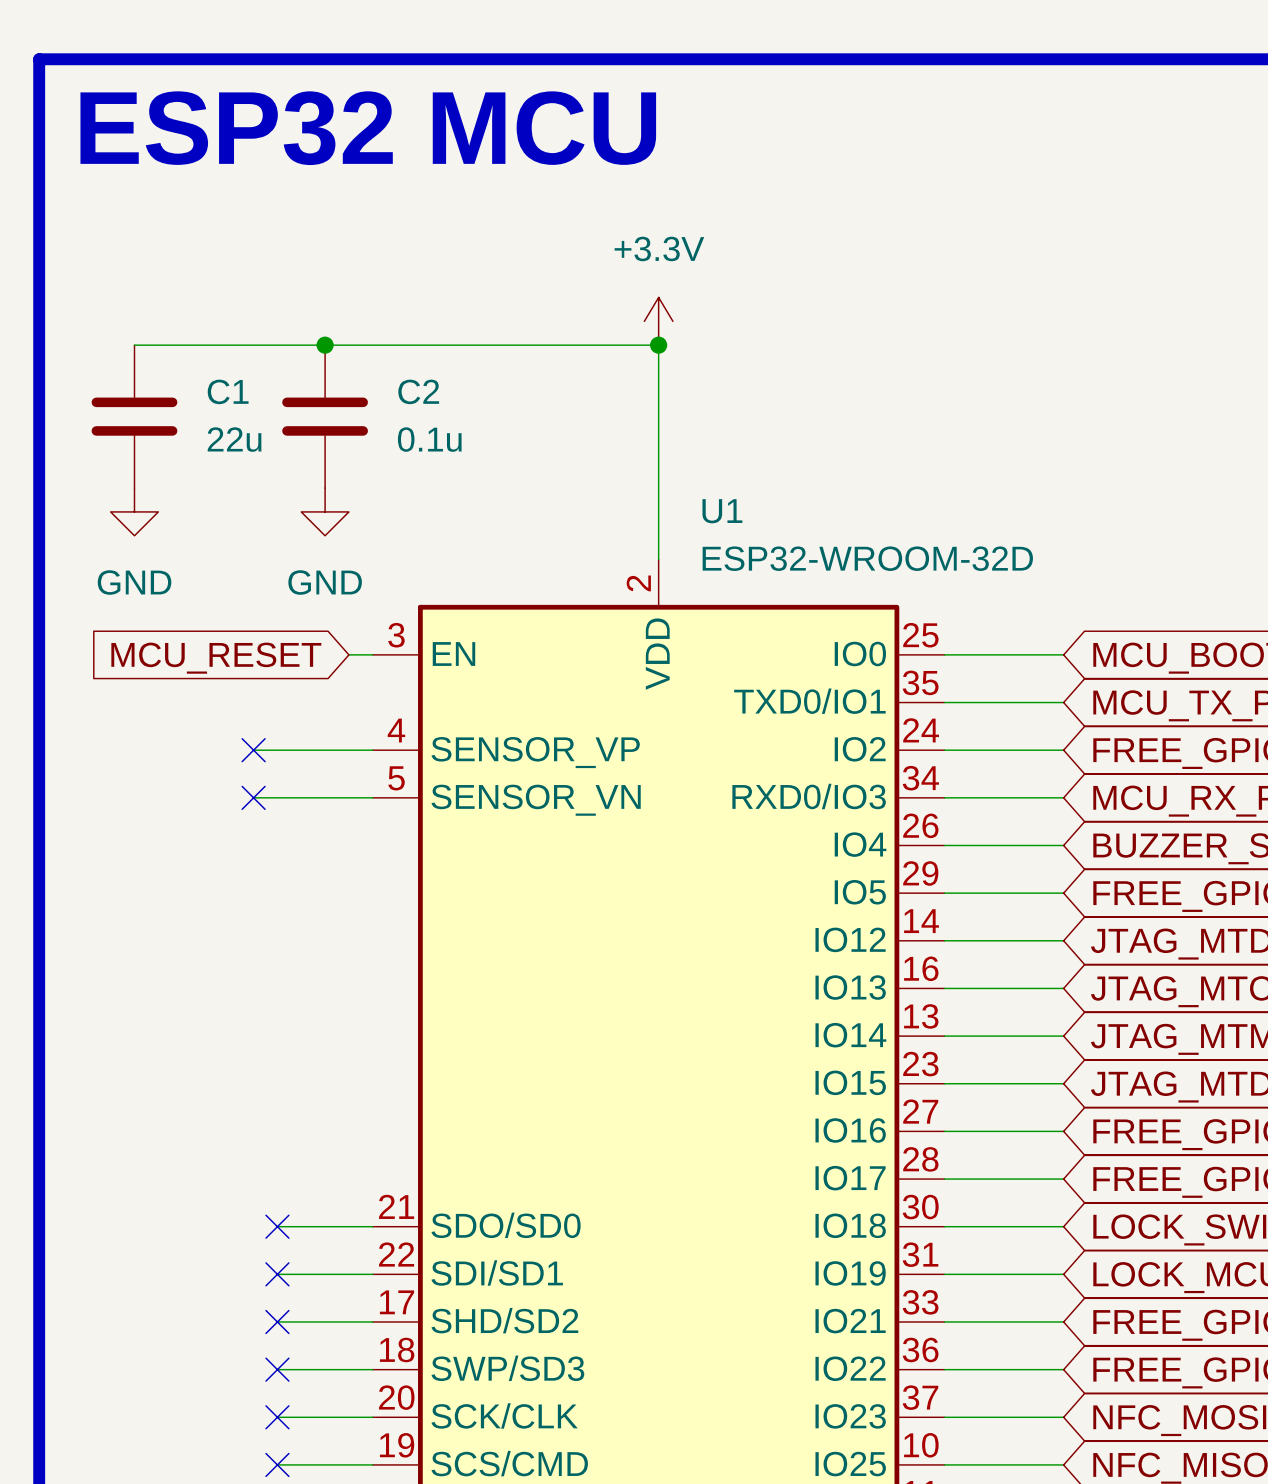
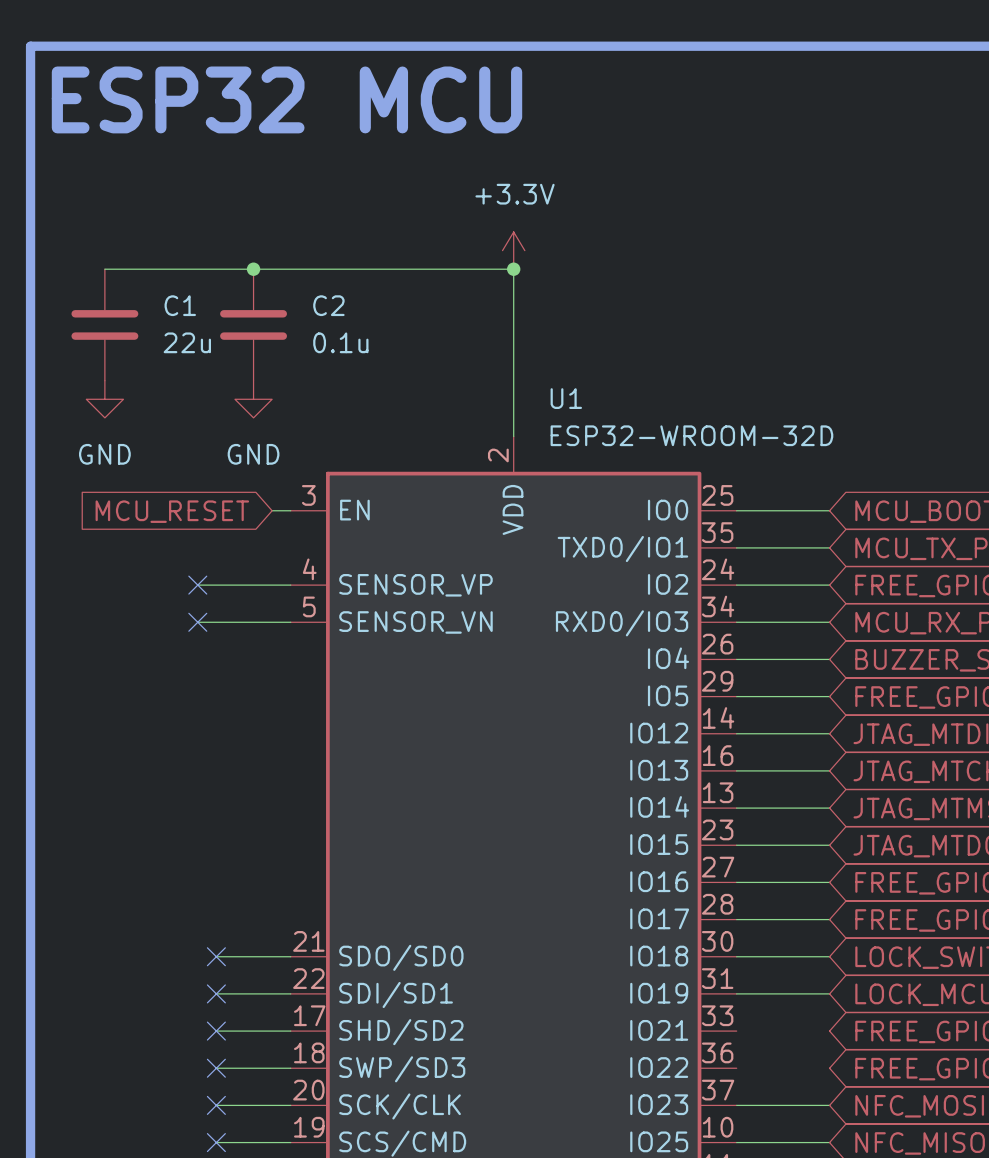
wire: (944, 1322) (1063, 1322) -> none
wire: (944, 1369) (1063, 1369) -> none

